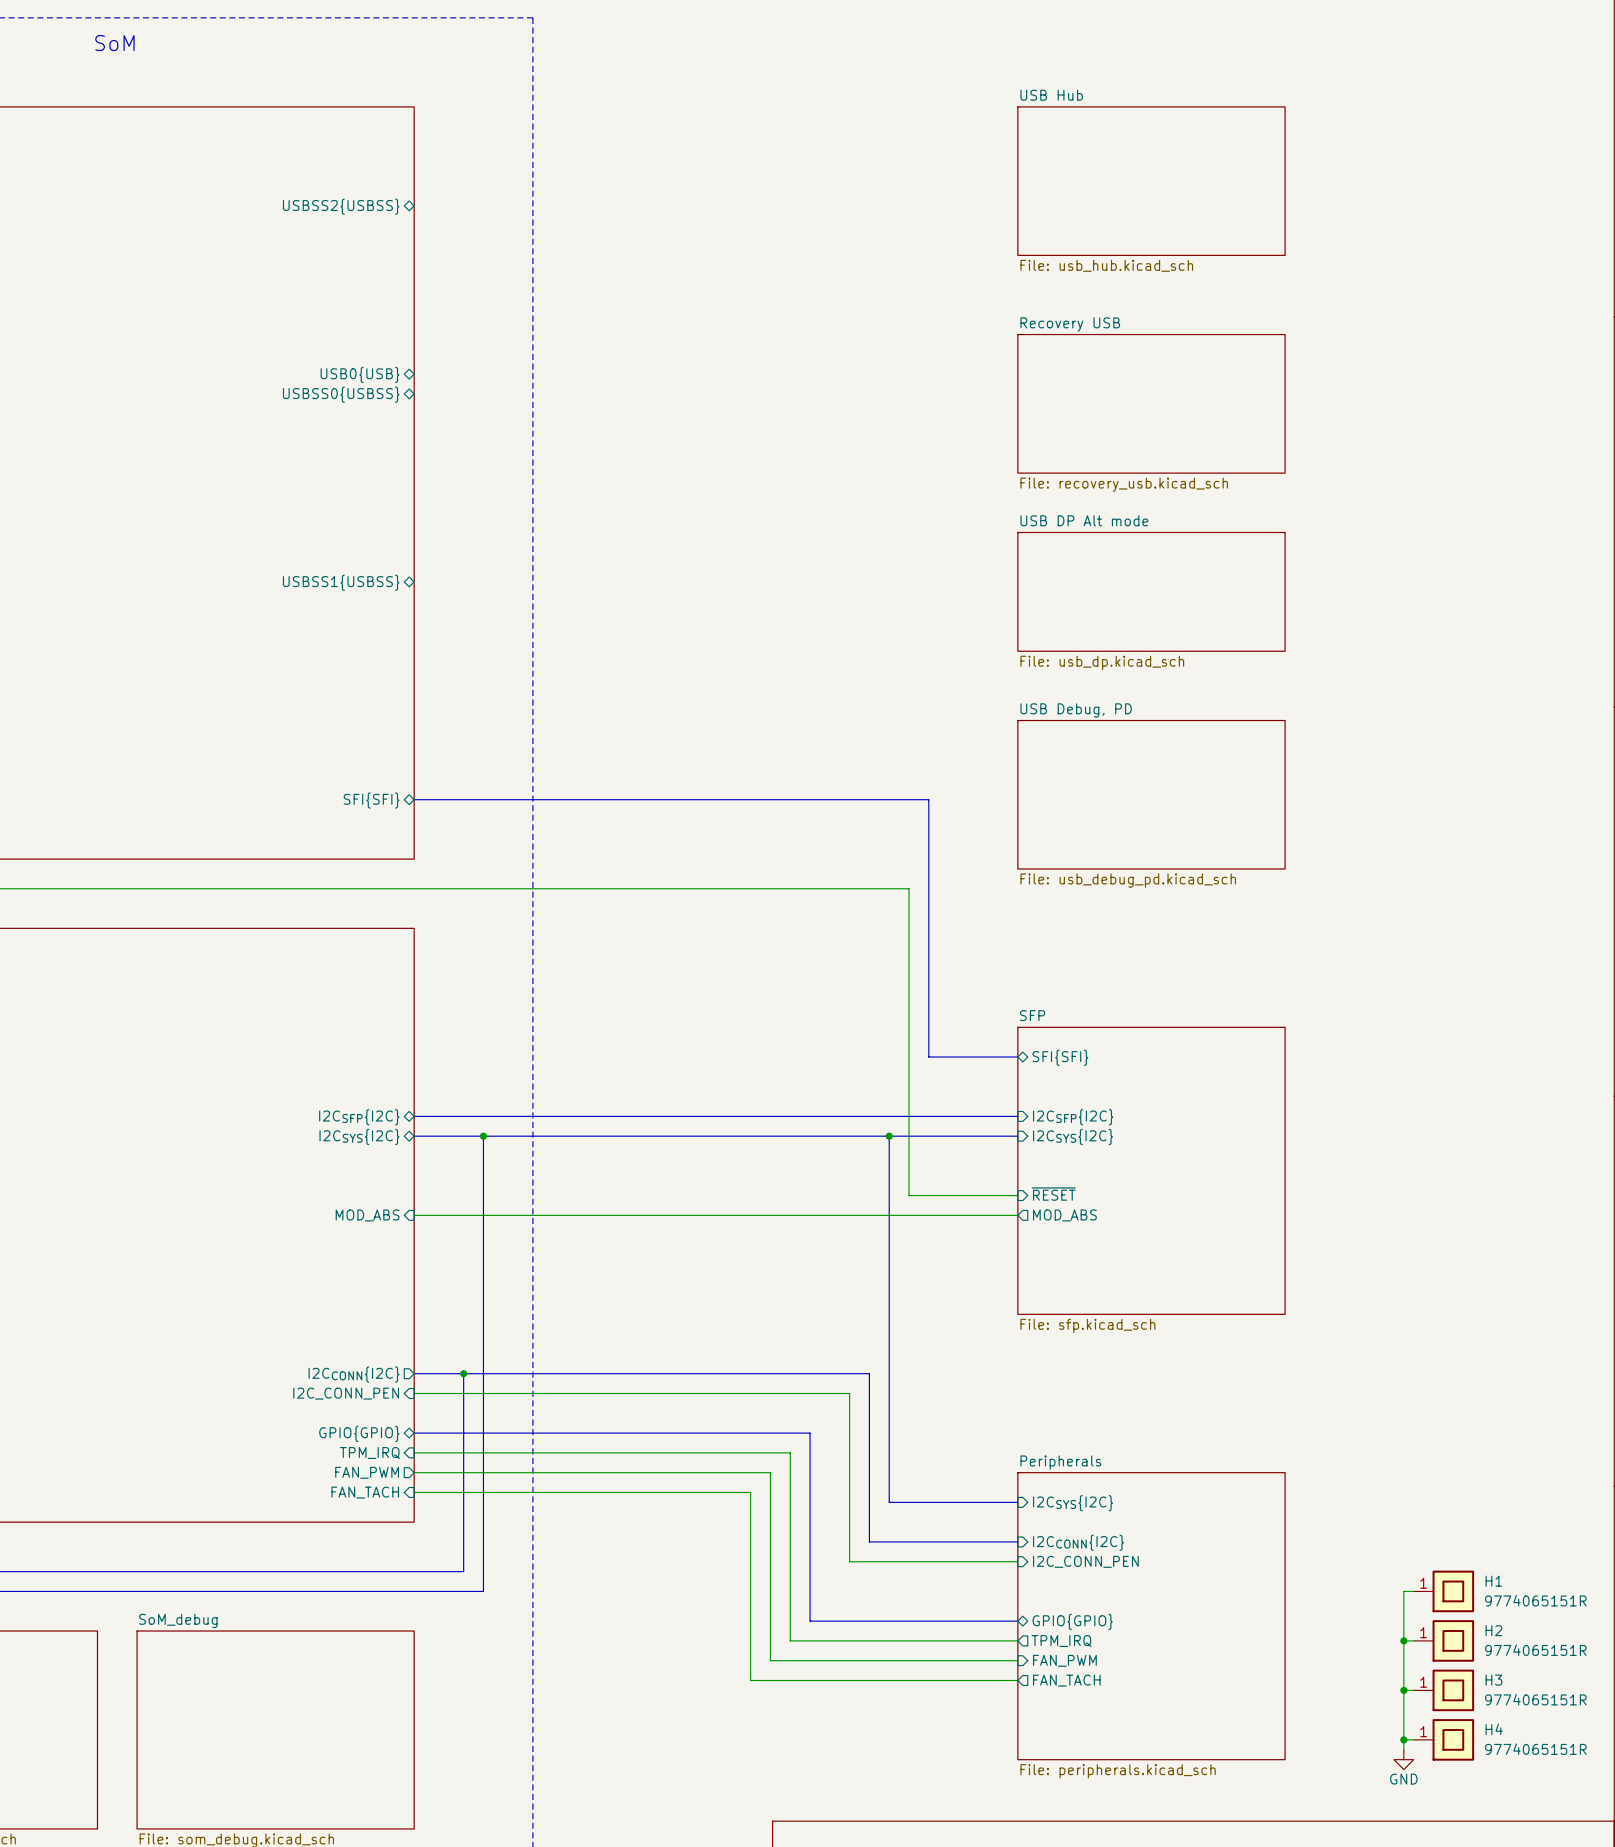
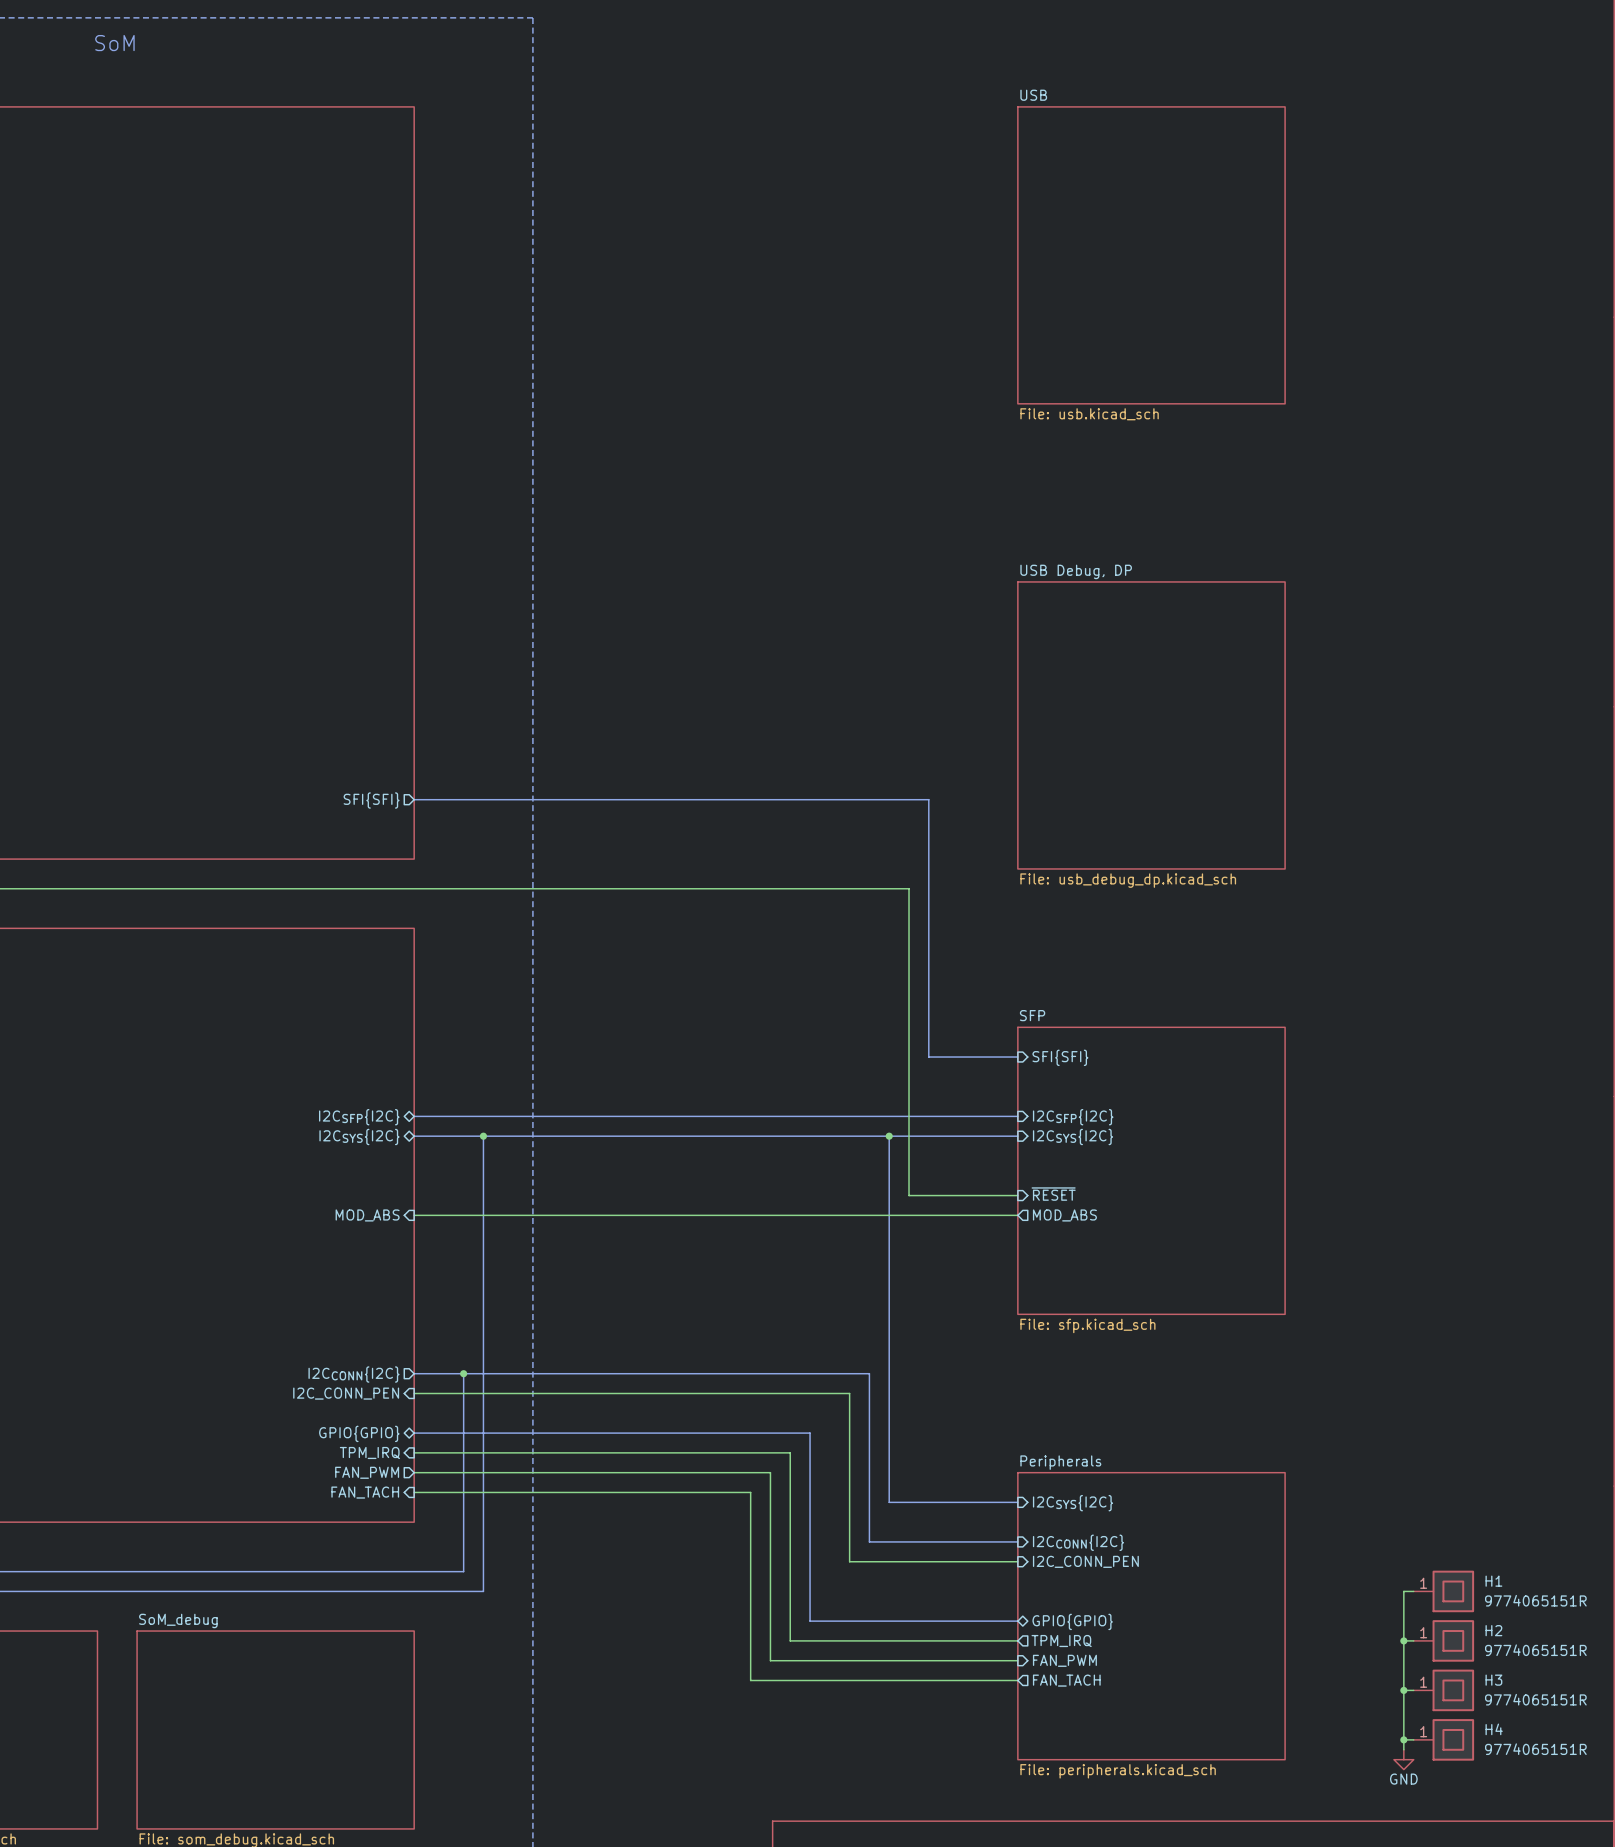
sheet USB Hub: File: usb_hub.kicad_sch (1151, 181) -> none
sheet pin: USBSS2{USBSS} (341, 206) -> none
sheet USB: none -> File: usb.kicad_sch (1151, 255)
sheet pin: USB0{USB} (360, 374) -> none
sheet pin: USBSS0{USBSS} (341, 394) -> none
sheet Recovery USB: File: recovery_usb.kicad_sch (1151, 403) -> none
sheet pin: USBSS1{USBSS} (341, 582) -> none
sheet USB DP Alt mode: File: usb_dp.kicad_sch (1151, 591) -> none
sheet USB Debug, DP: none -> File: usb_debug_dp.kicad_sch (1151, 725)
sheet USB Debug, PD: File: usb_debug_pd.kicad_sch (1151, 794) -> none
sheet pin shape: bidirectional (371, 800) -> output (371, 800)
sheet pin shape: bidirectional (1060, 1057) -> input (1060, 1057)

